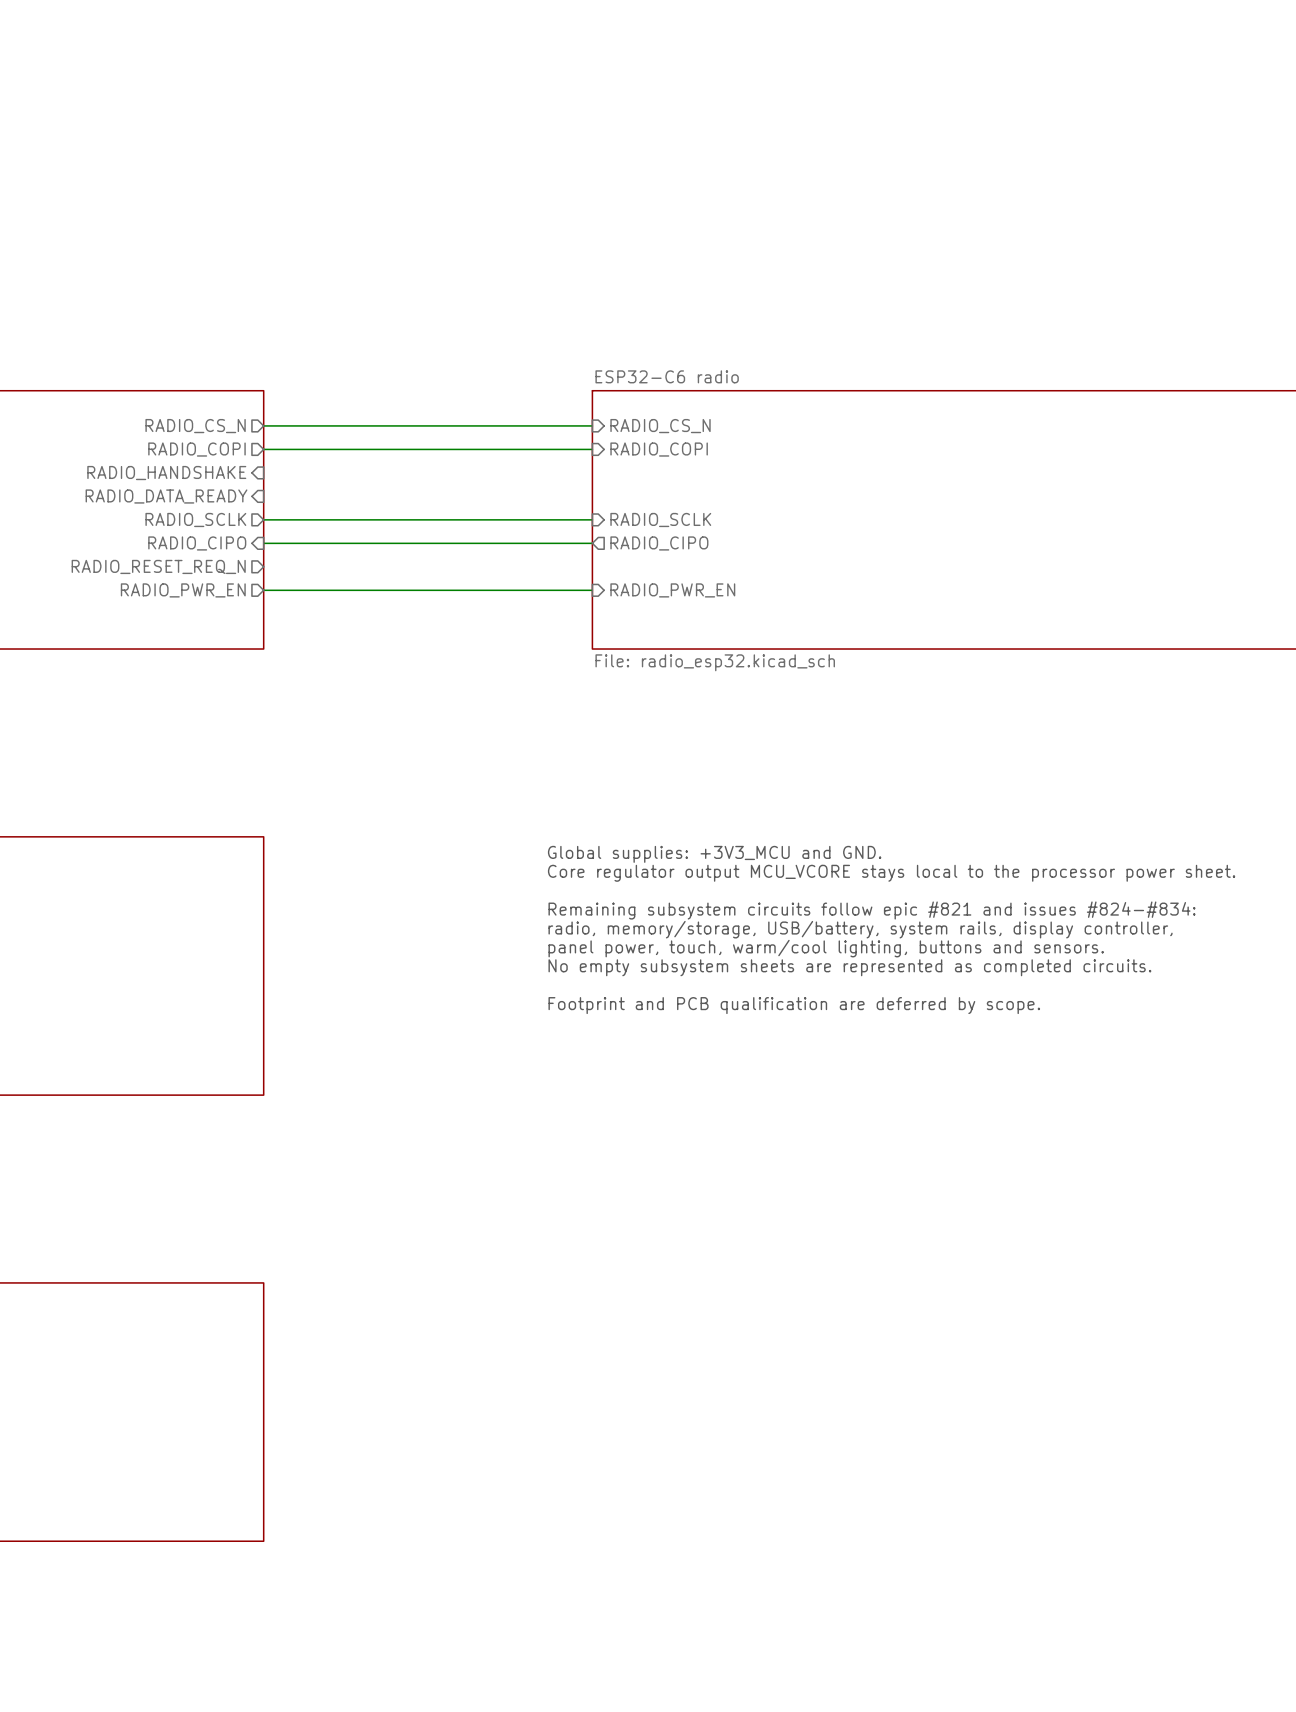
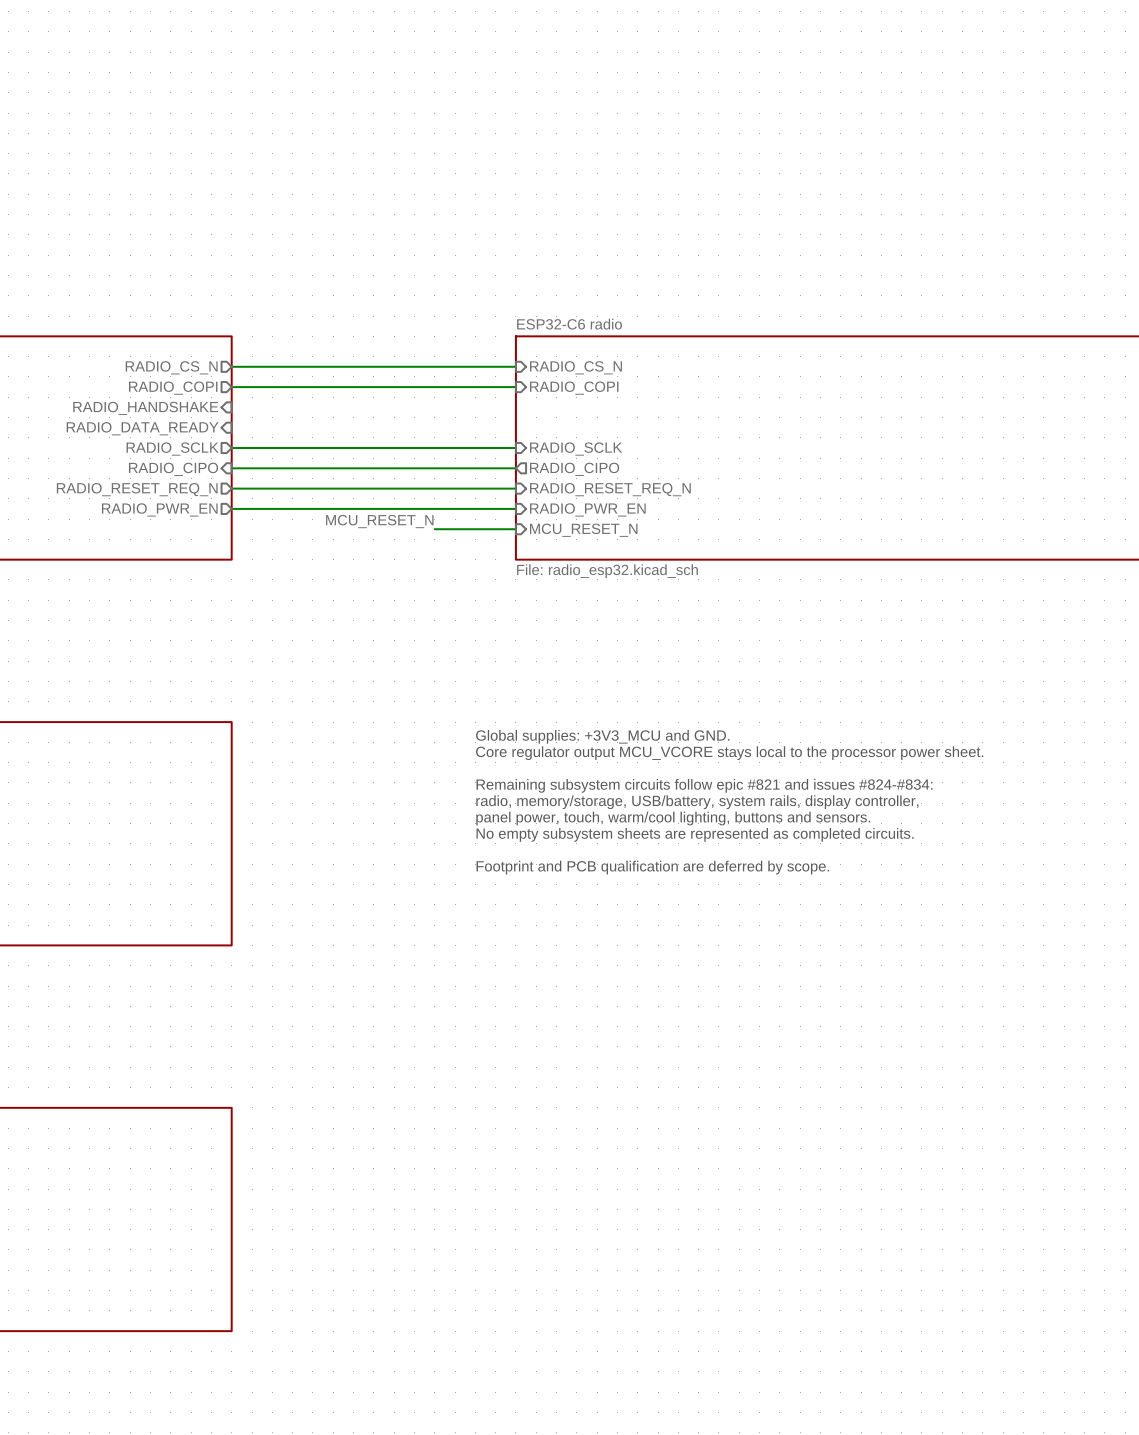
wire: none -> (231, 488) (515, 488)
sheet pin: none -> RADIO_RESET_REQ_N (610, 489)
label: none -> MCU_RESET_N (379, 521)
wire: none -> (434, 529) (515, 529)
sheet pin: none -> MCU_RESET_N (583, 530)

